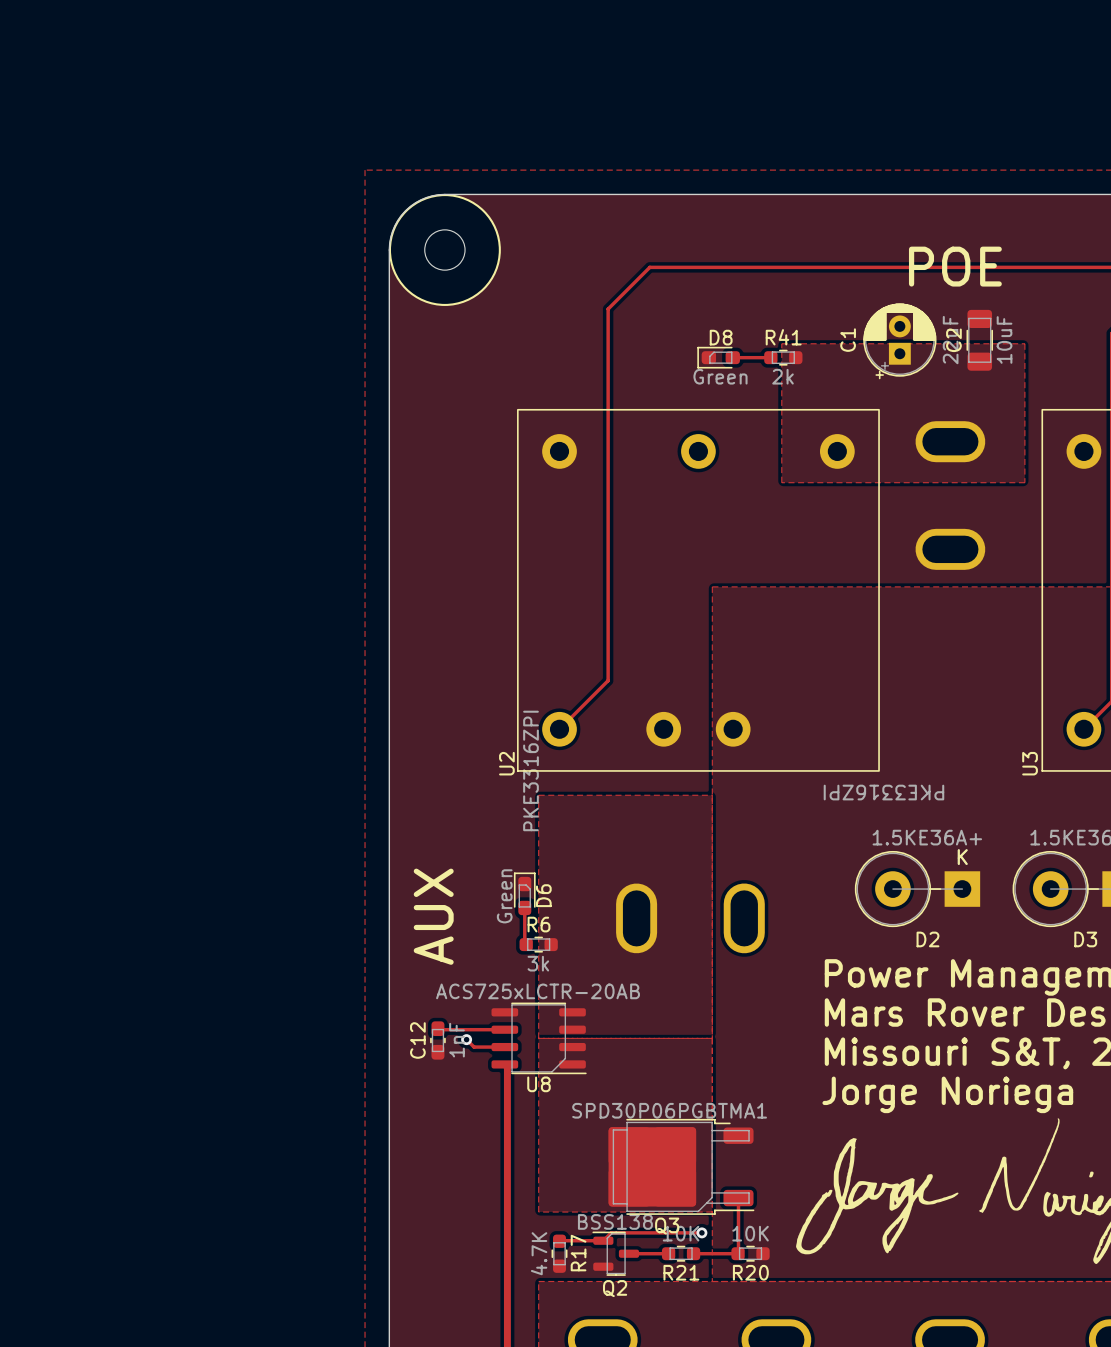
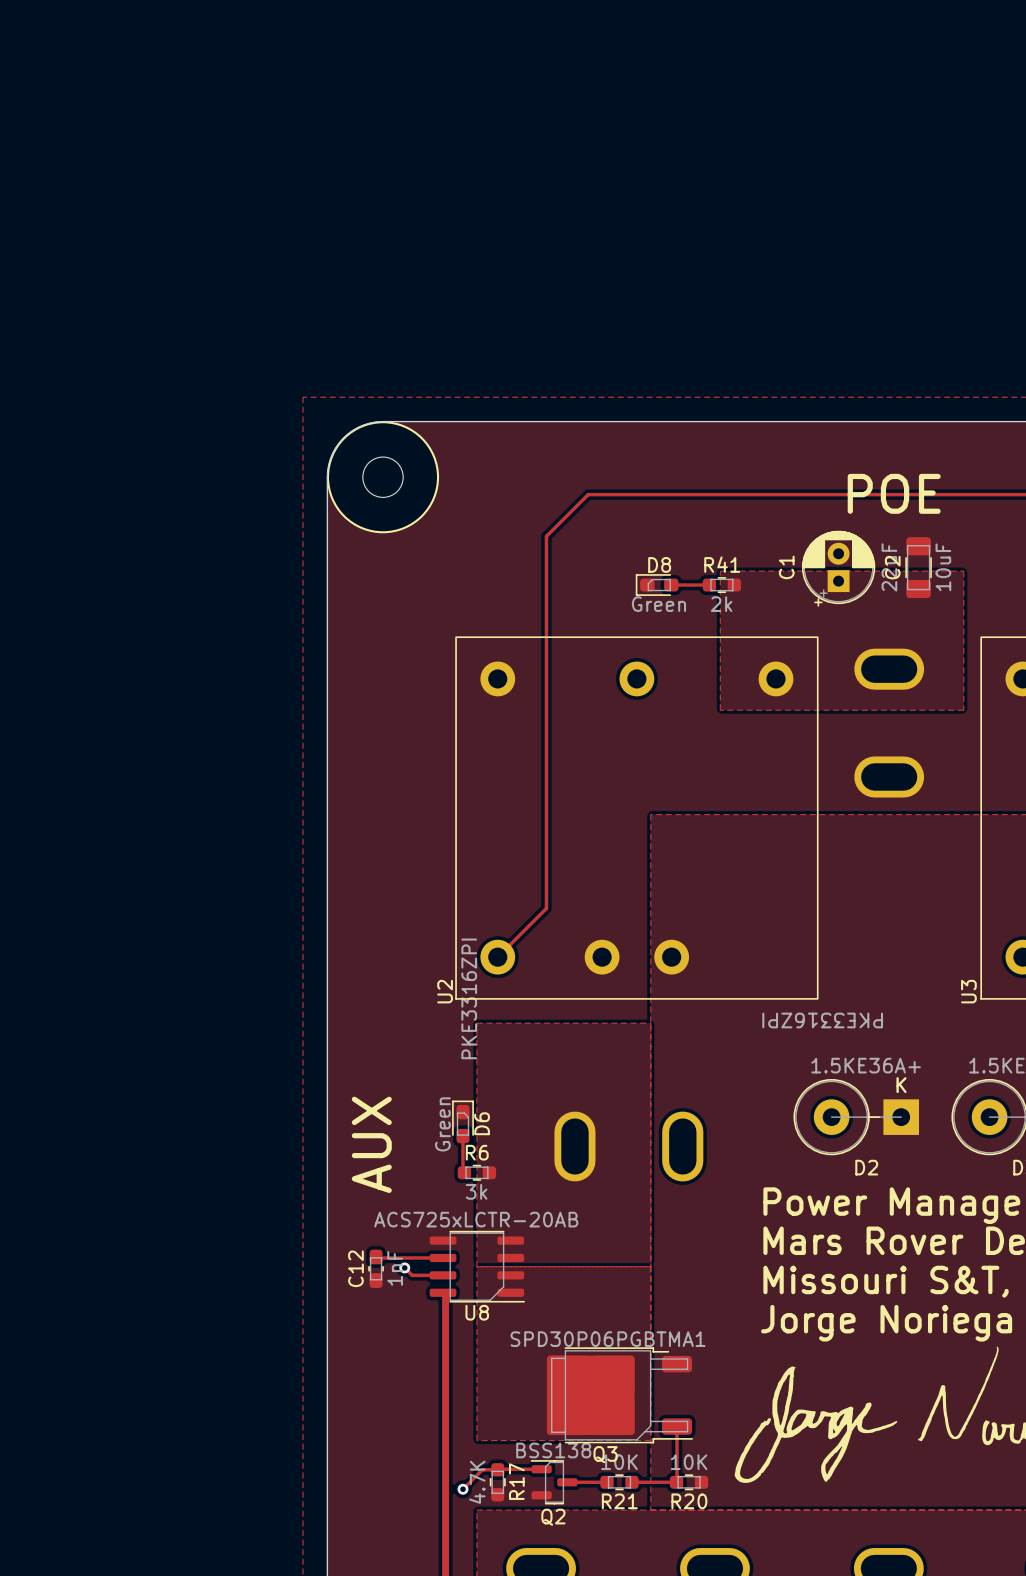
track: (701, 1232) (611, 1232) (603, 1240) -> none
via: (701, 1232) -> none
track: none -> (497, 1469) (482, 1469) (463, 1489)
via: none -> (463, 1489)

